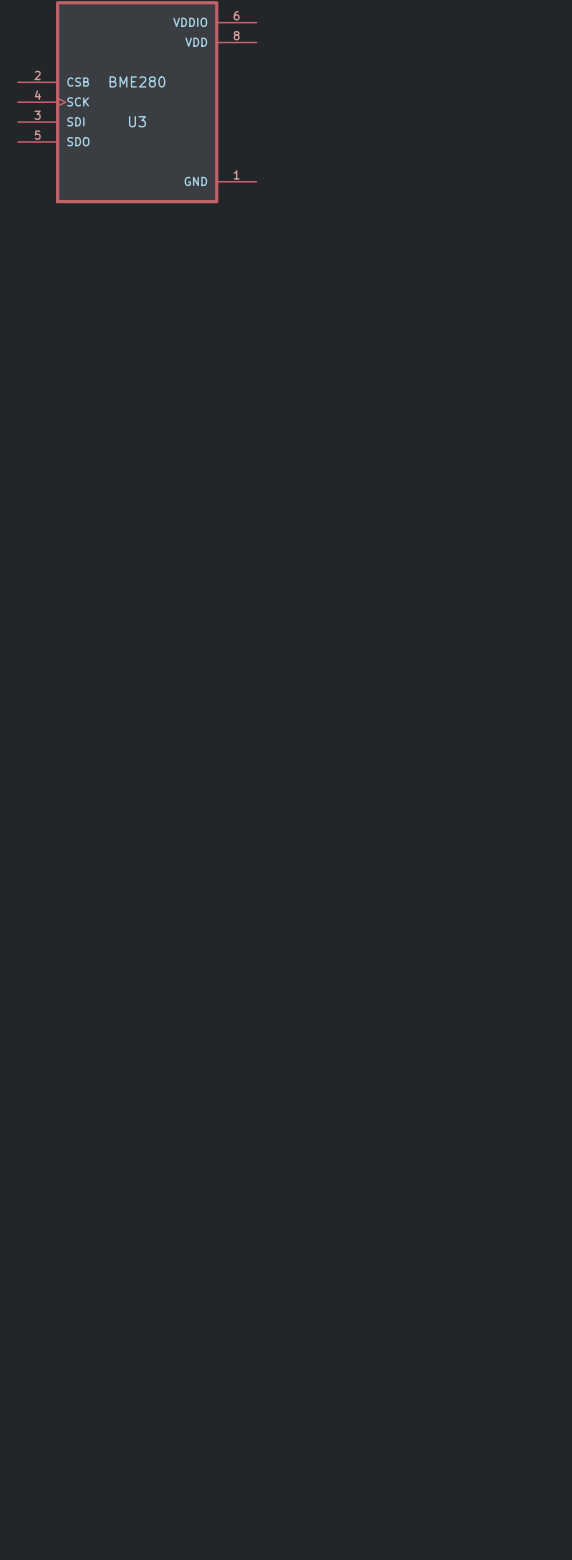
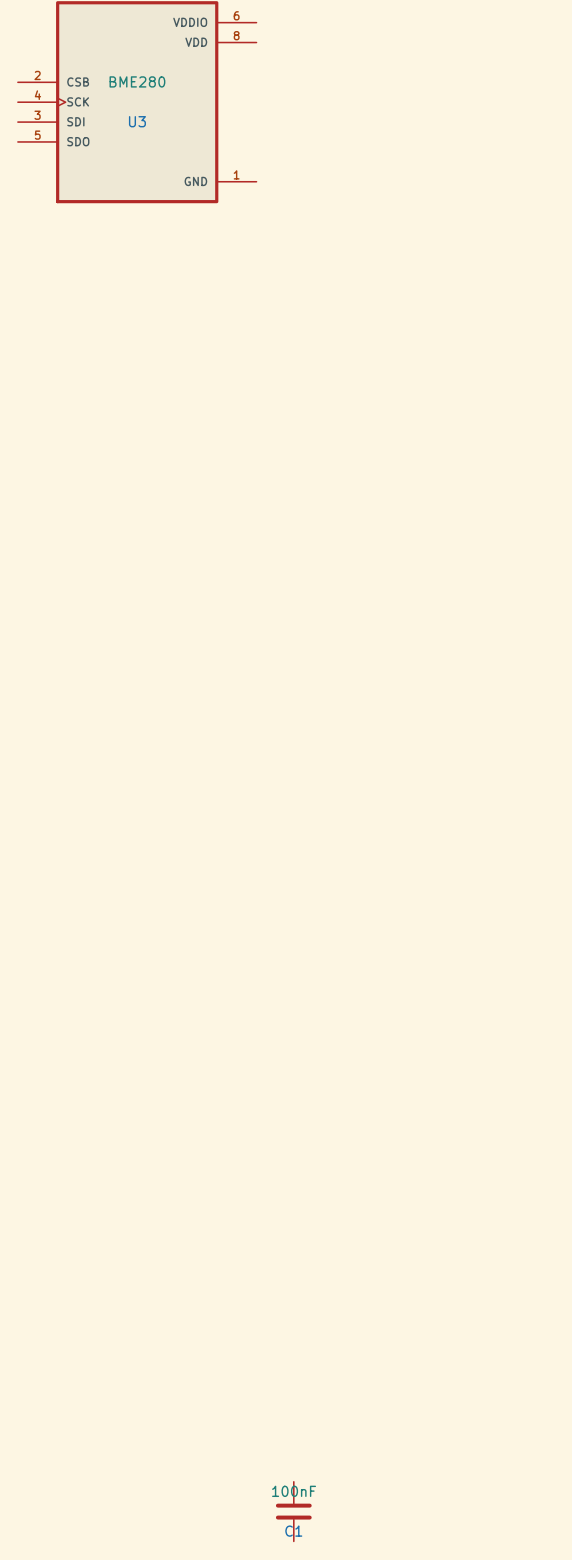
C1: none -> 100nF (293, 1511)

